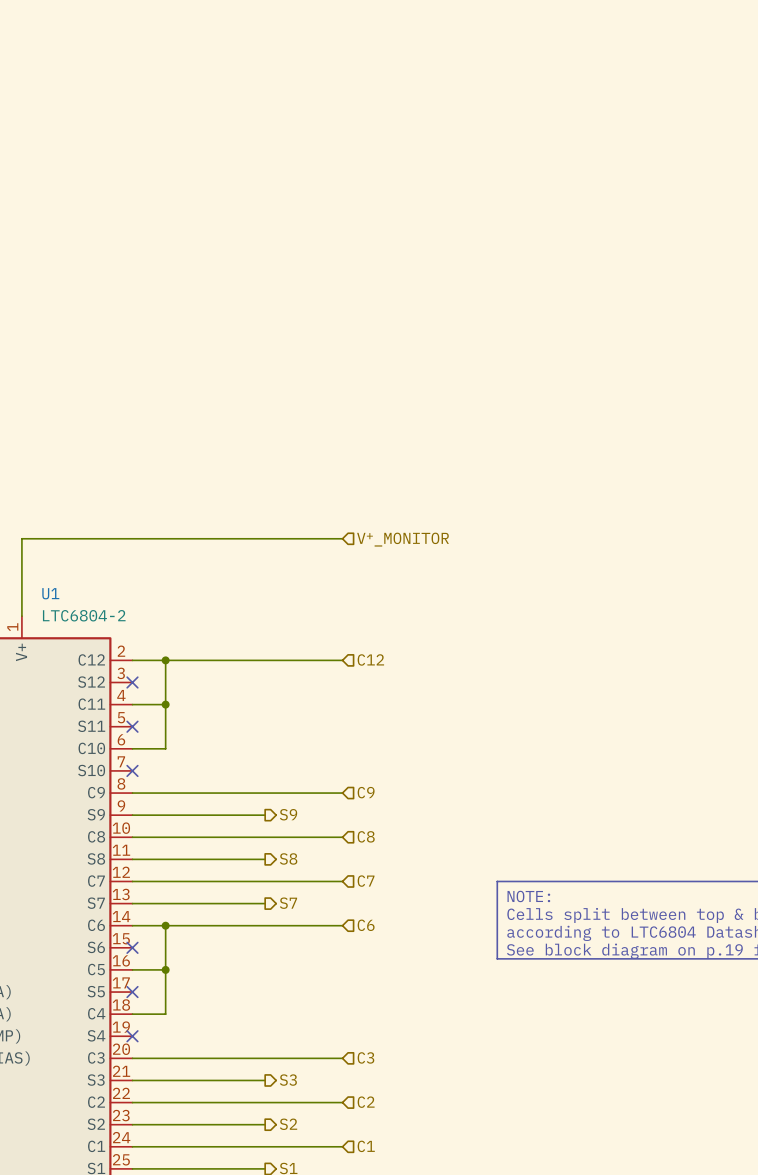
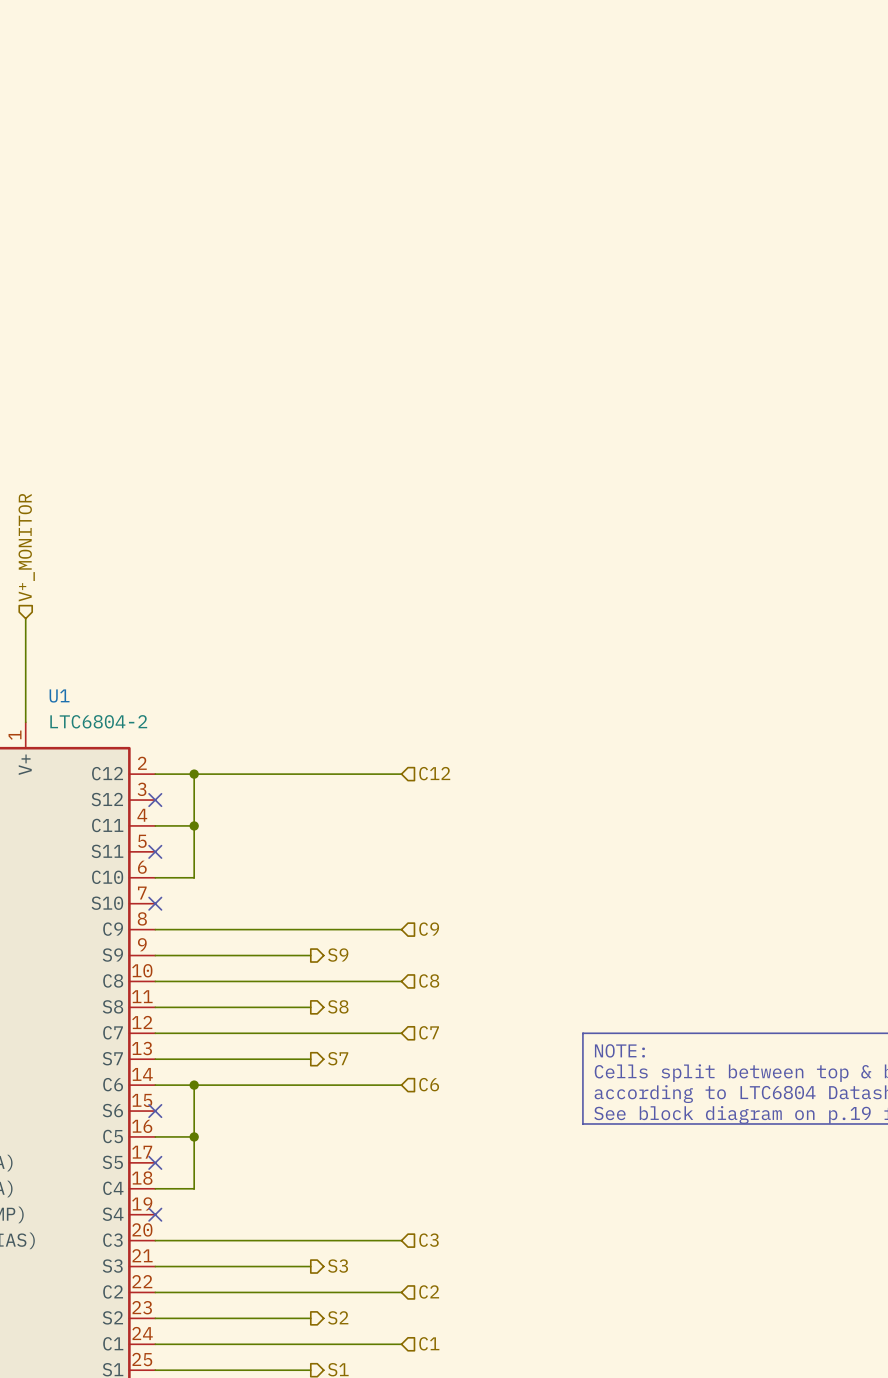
hierarchical label: none -> V+_MONITOR (26, 547)
wire: (21, 538) (342, 538) -> (25, 631) (25, 618)
hierarchical label: V+_MONITOR (403, 539) -> none

